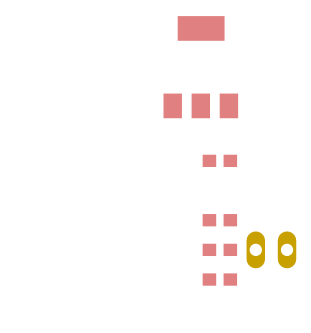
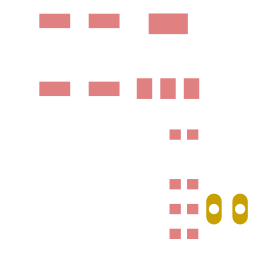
part: none -> (79, 20)
part: none -> (79, 88)

